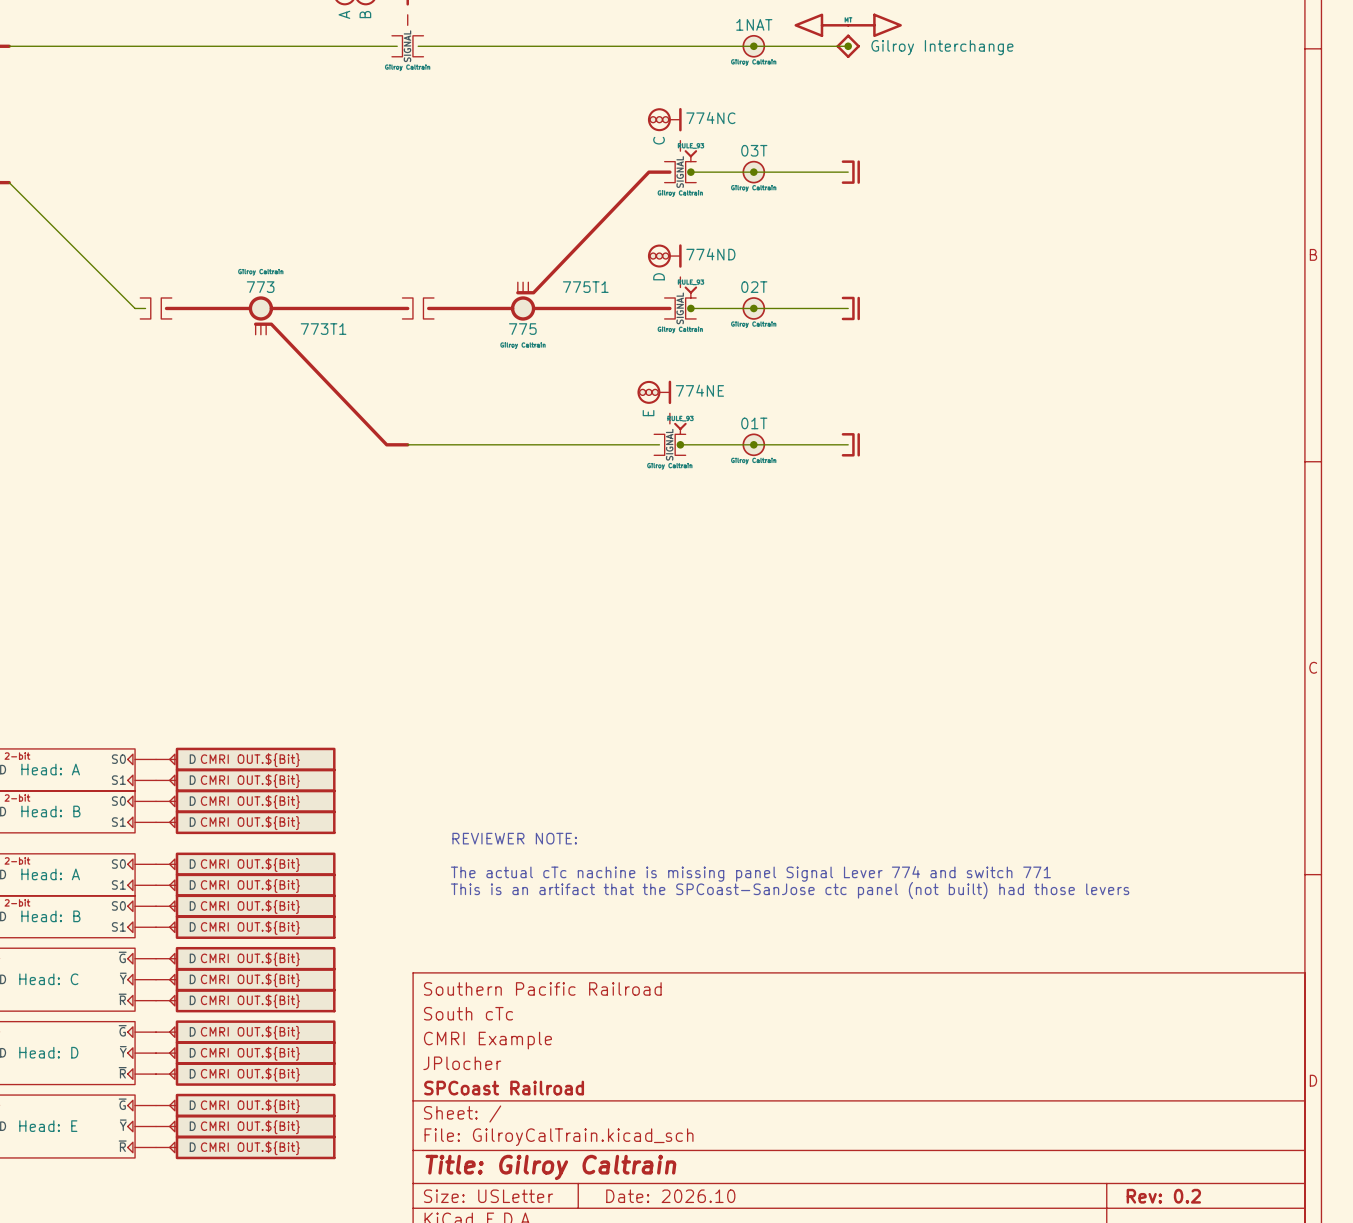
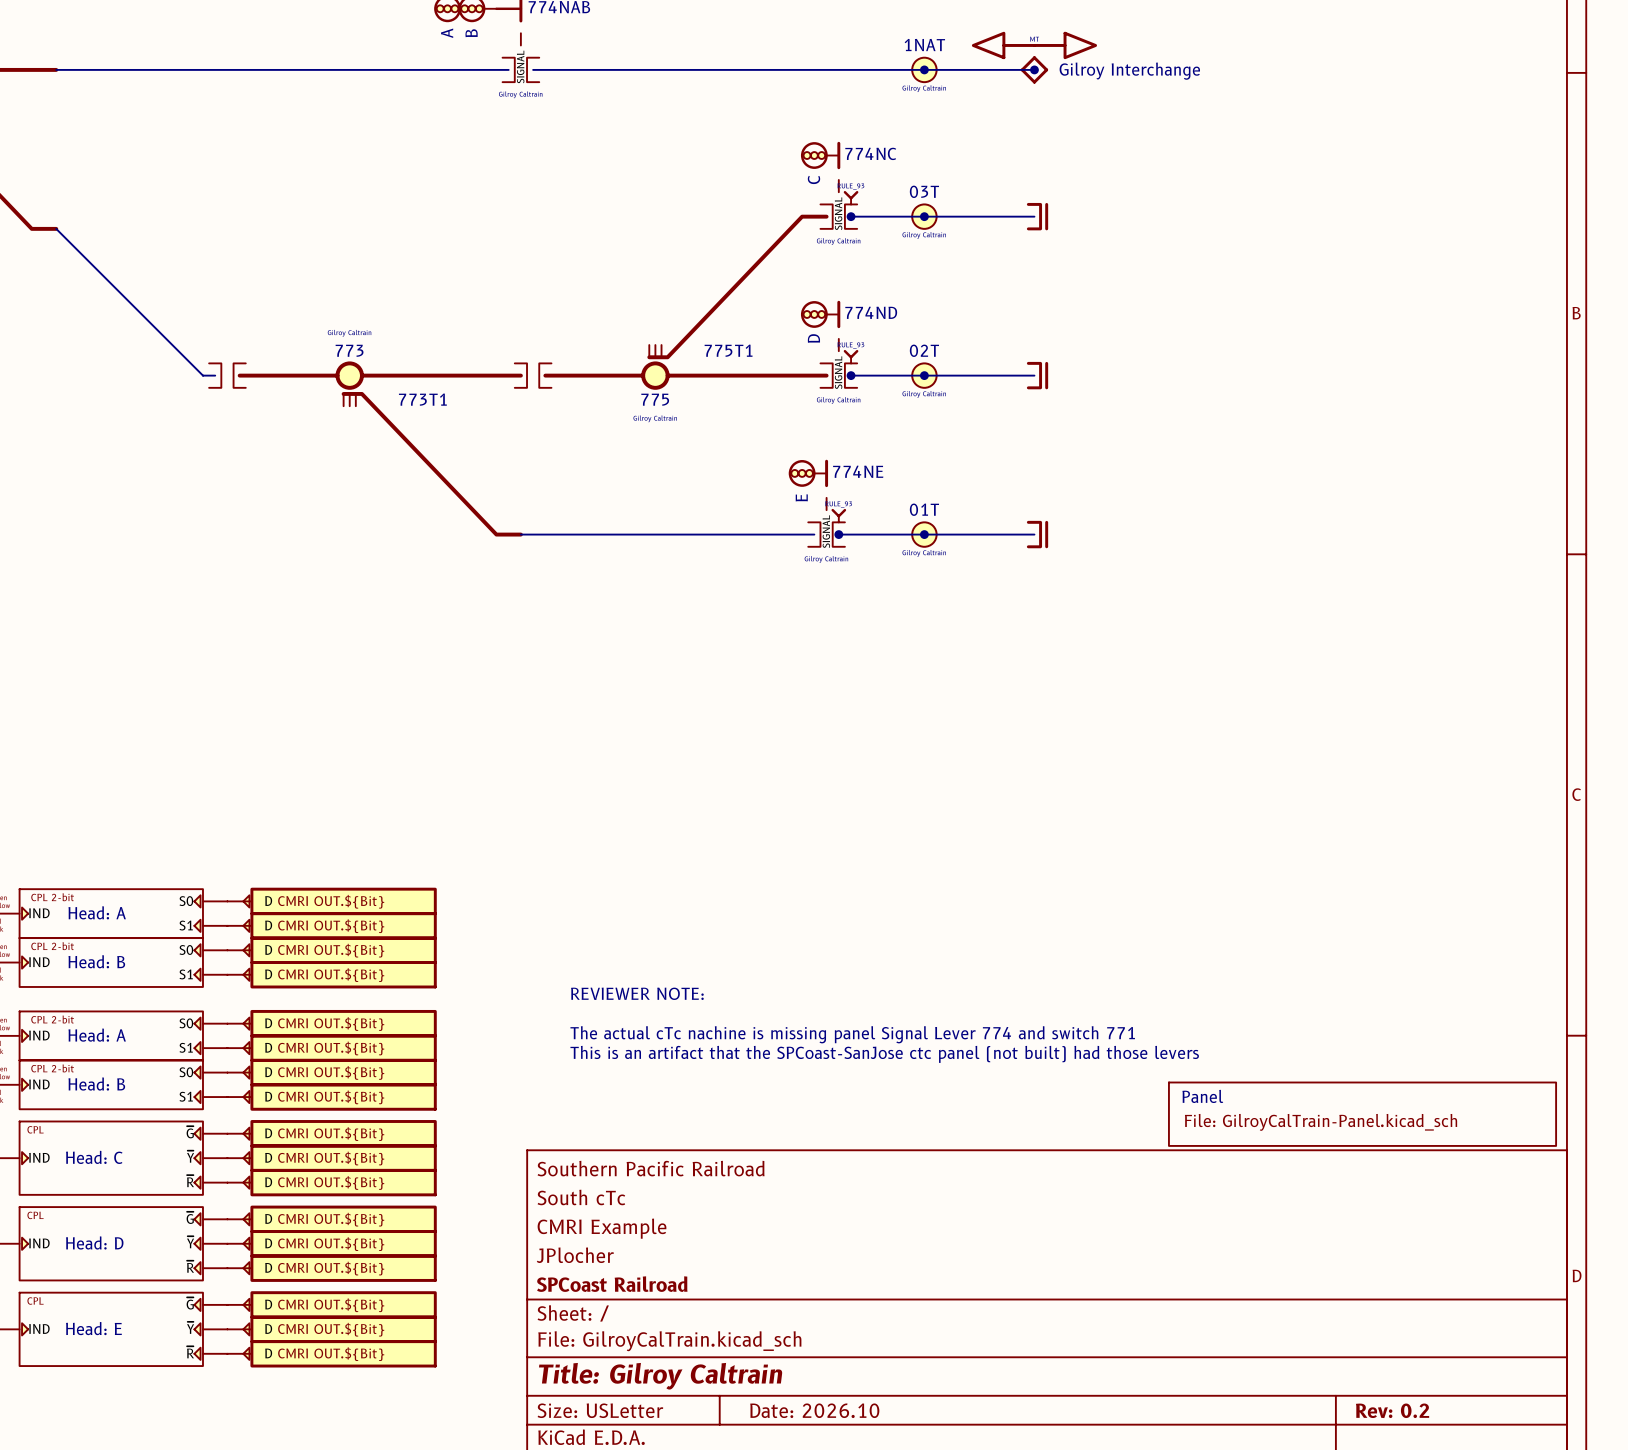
sheet Panel: none -> File: GilroyCalTrain-Panel.kicad_sch (1362, 1114)

